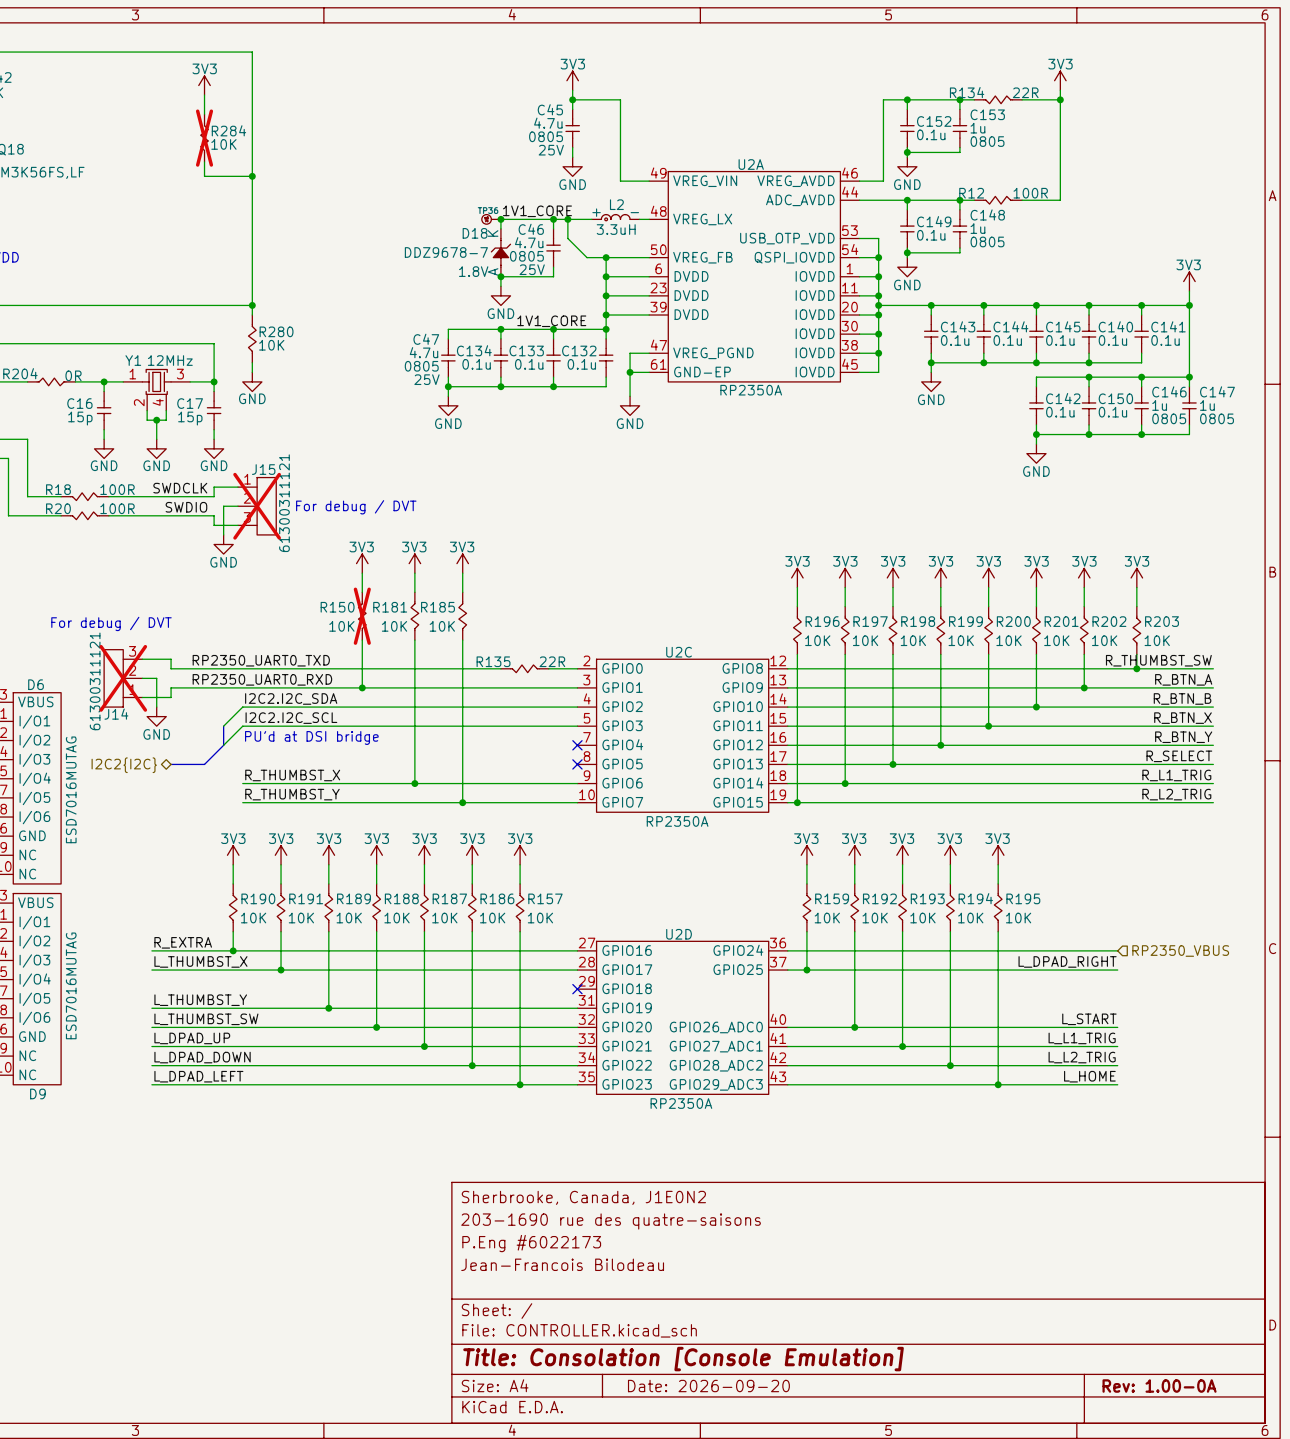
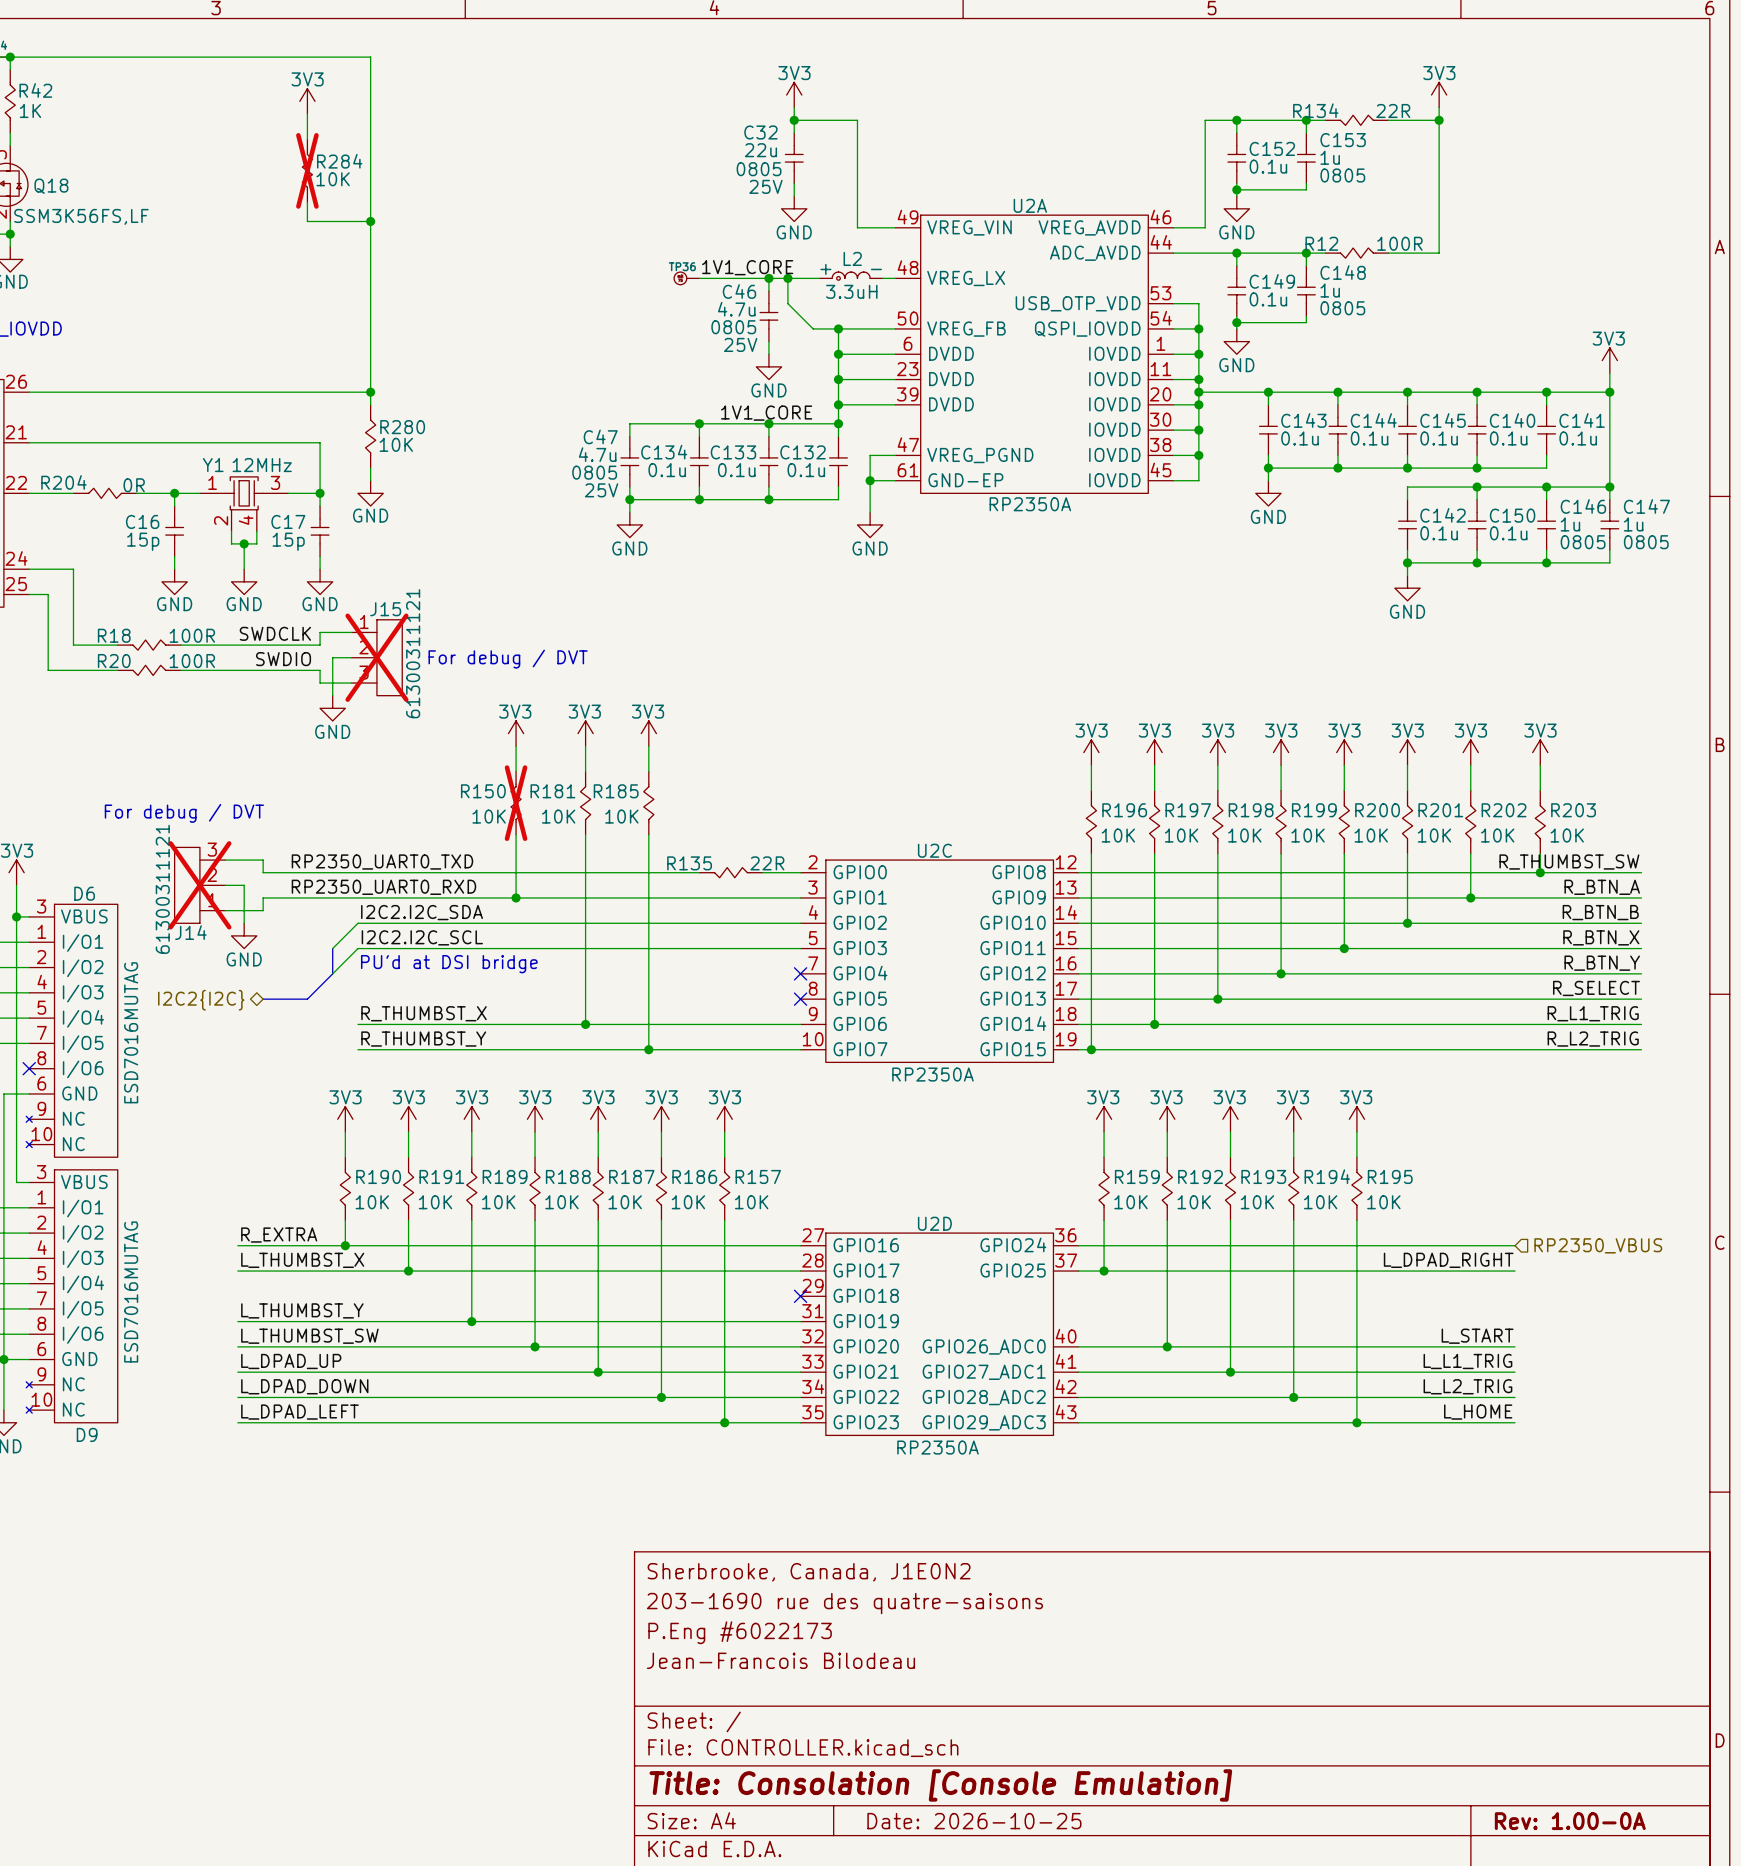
C45 name: C45 (550, 109) -> C32 (760, 132)
C45 value: 4.7u (548, 123) -> 22u (760, 150)
wire: (500, 219) (500, 228) -> none
junction: (500, 219) -> none
D18: DDZ9678-7 (500, 252) -> none
junction: (500, 276) -> none
wire: (553, 276) (500, 276) (500, 286) -> none
power symbol position: GND (500, 295) -> GND (768, 366)
title block: Date: 2026-09-20 (708, 1386) -> Date: 2026-10-25 (974, 1821)

